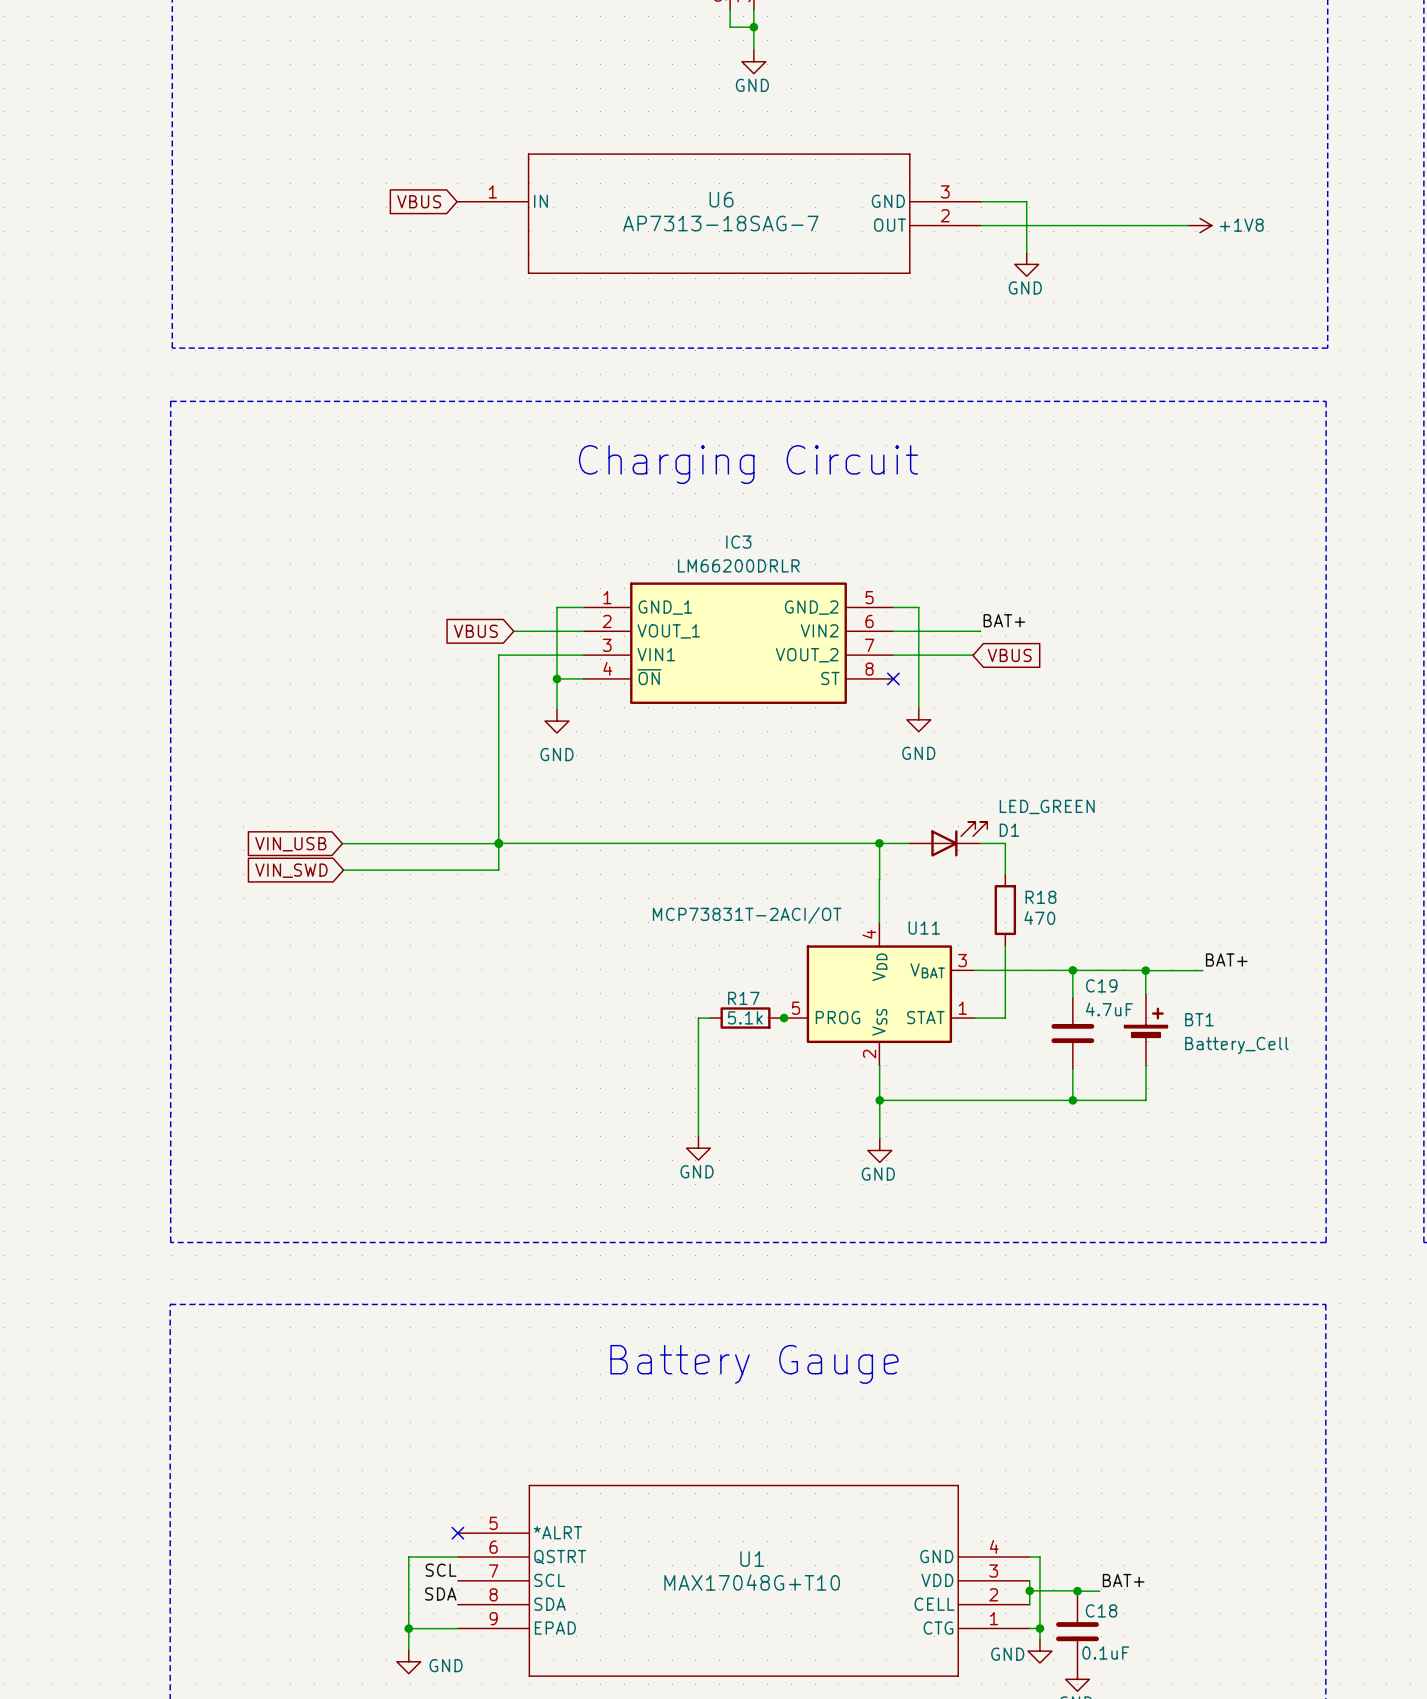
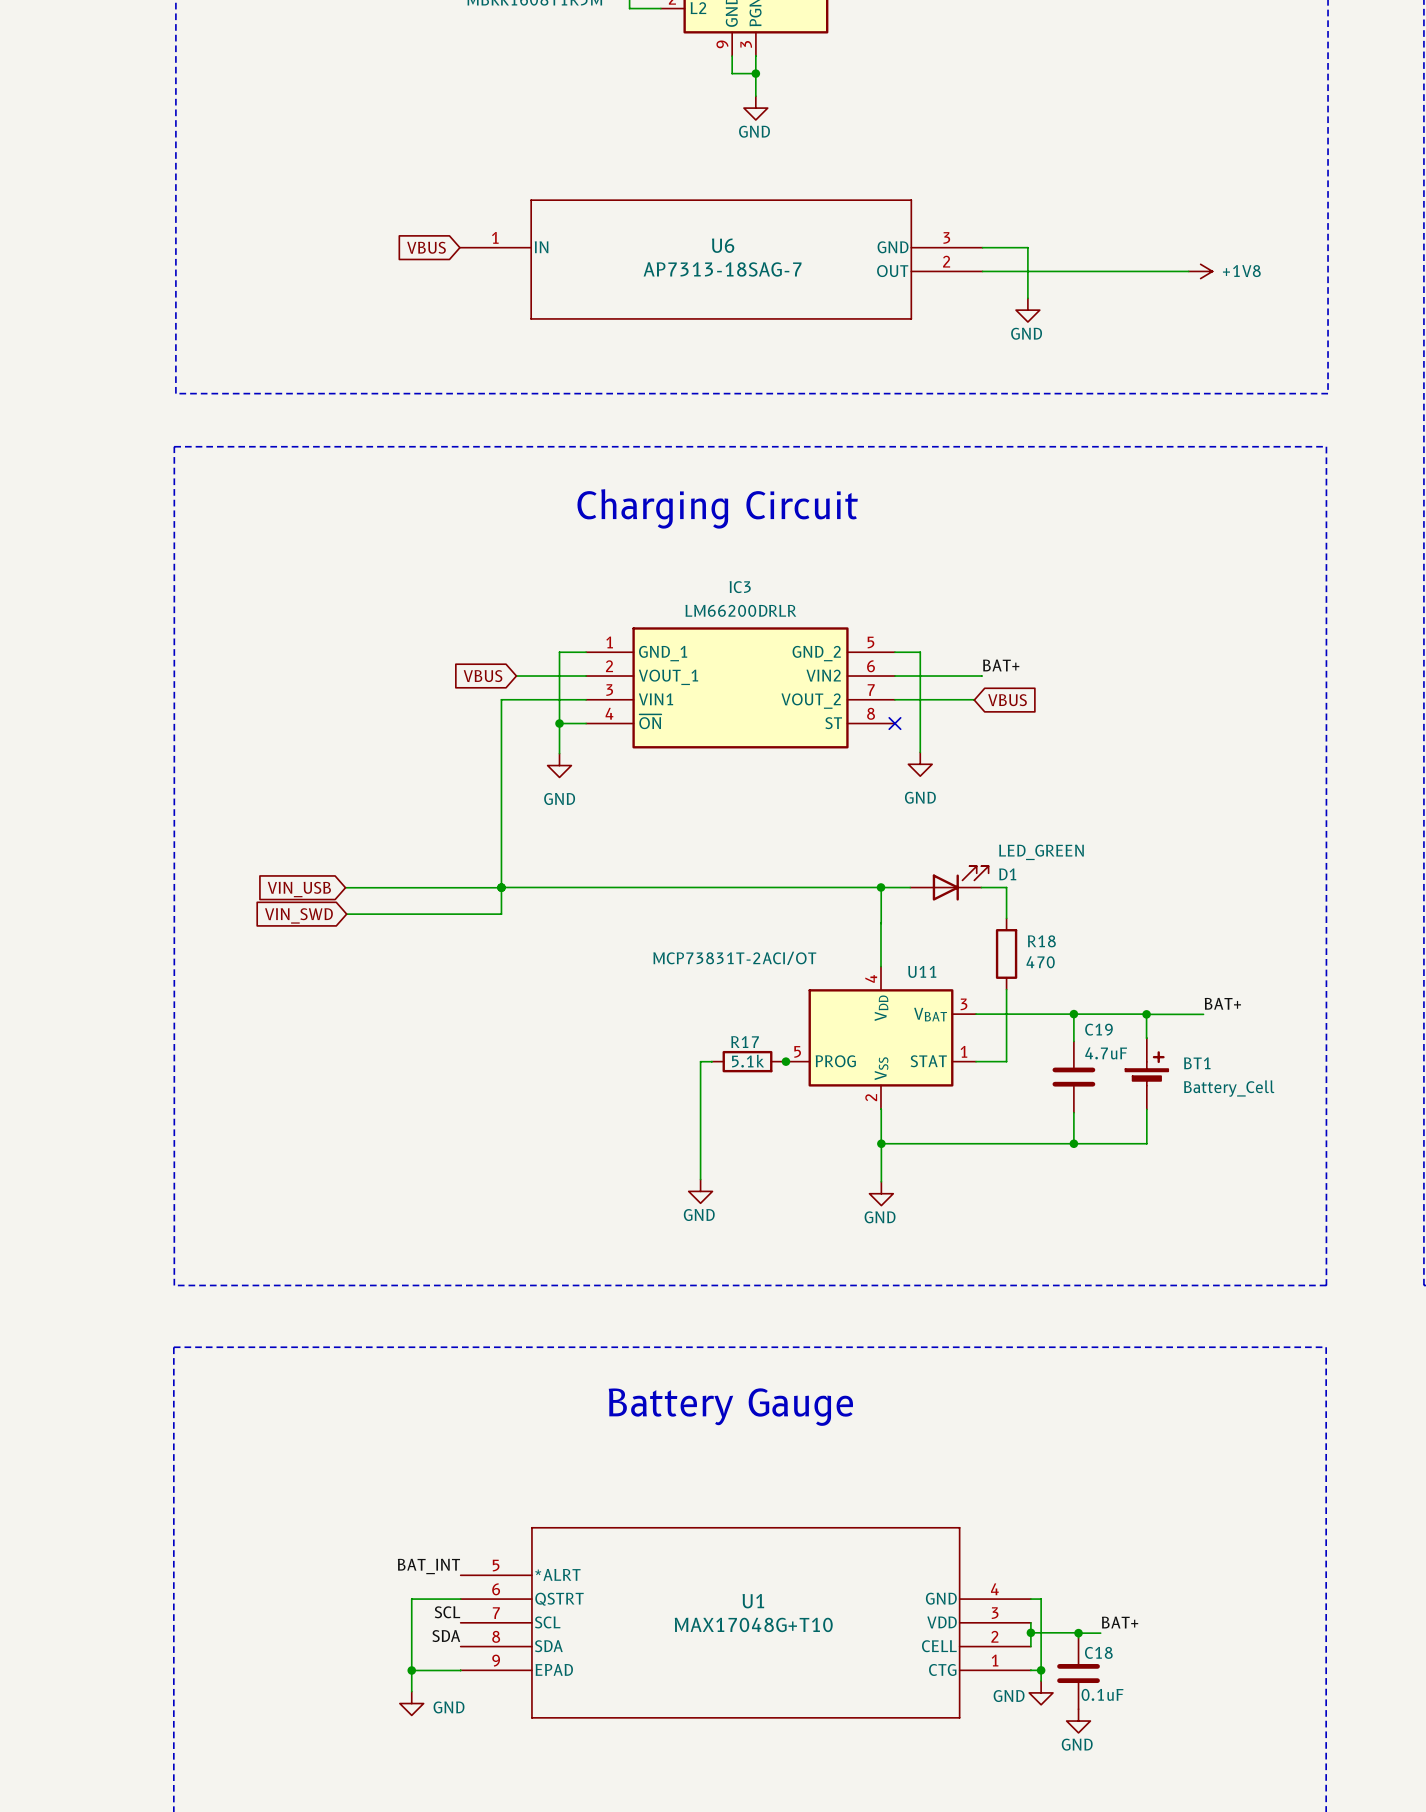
label: none -> BAT_INT (428, 1566)
no-connect mark: (457, 1533) -> none

